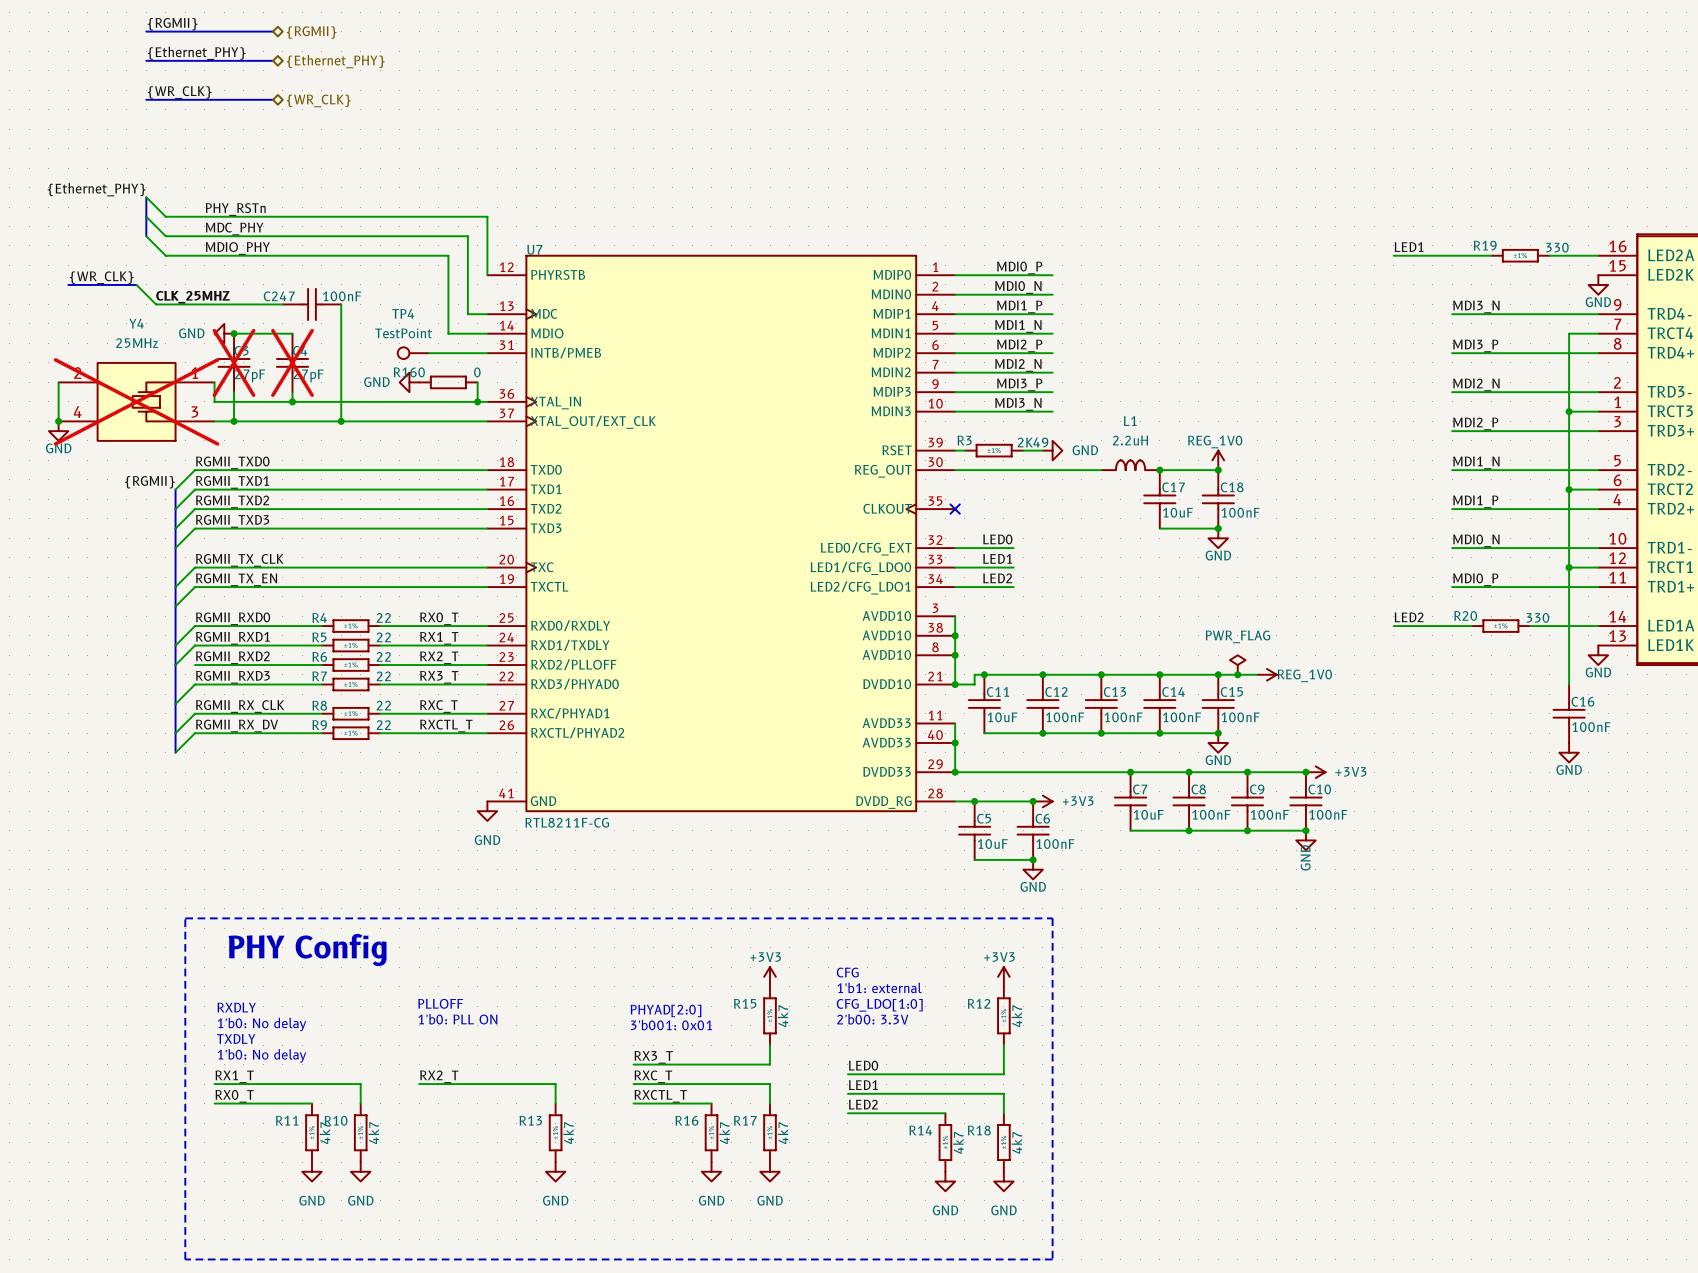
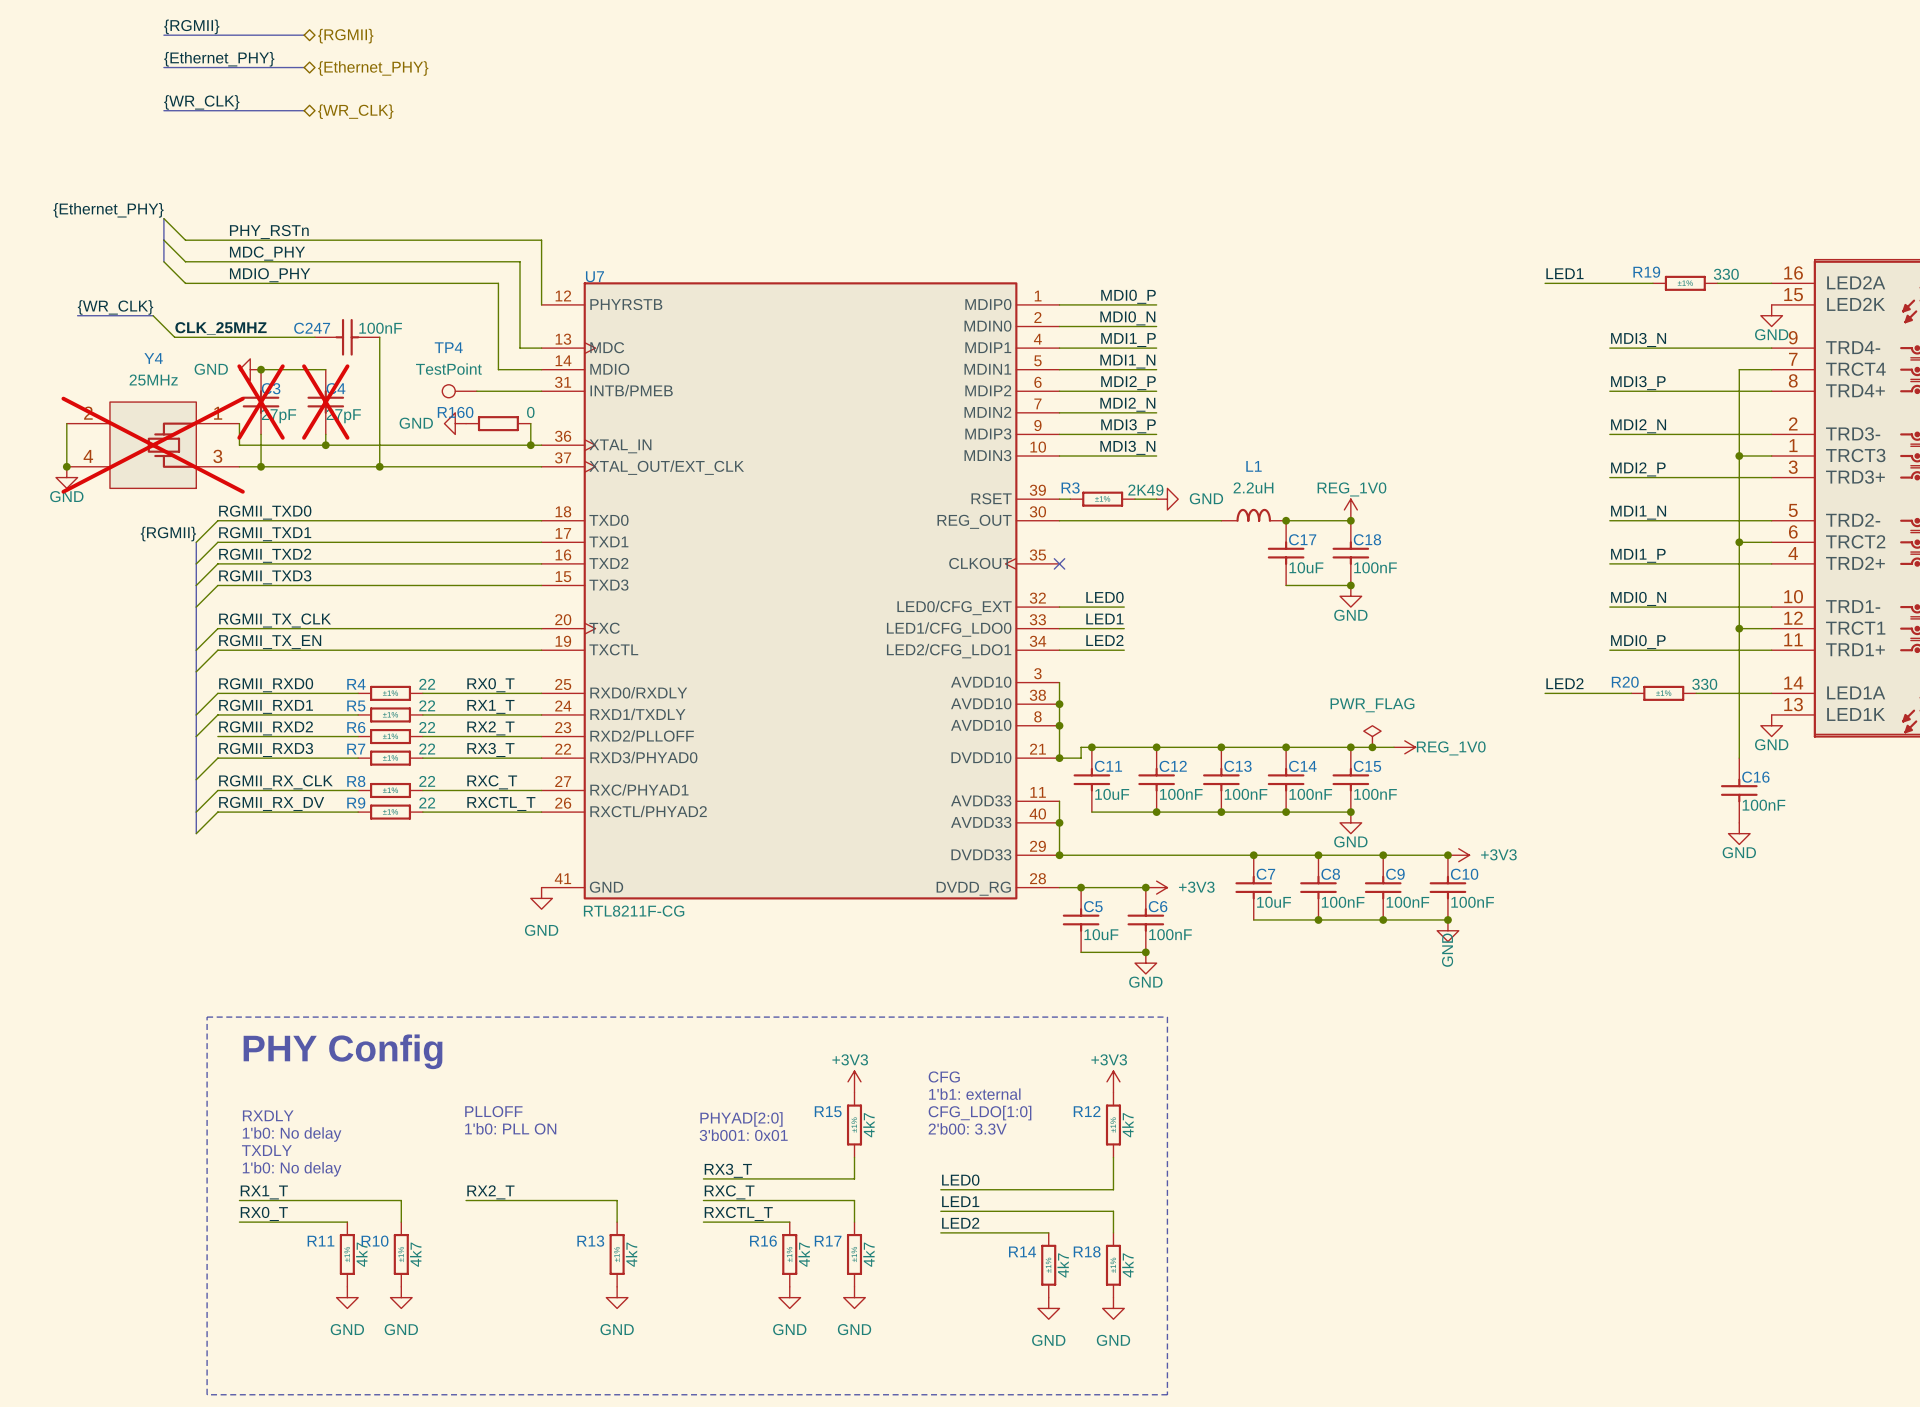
wire: (1042, 275) (1052, 275) -> none
wire: (1042, 294) (1052, 294) -> none
wire: (1042, 314) (1052, 314) -> none
wire: (1042, 333) (1052, 333) -> none
wire: (1042, 353) (1052, 353) -> none
wire: (1042, 372) (1052, 372) -> none
wire: (1042, 392) (1052, 392) -> none
wire: (1042, 411) (1052, 411) -> none

